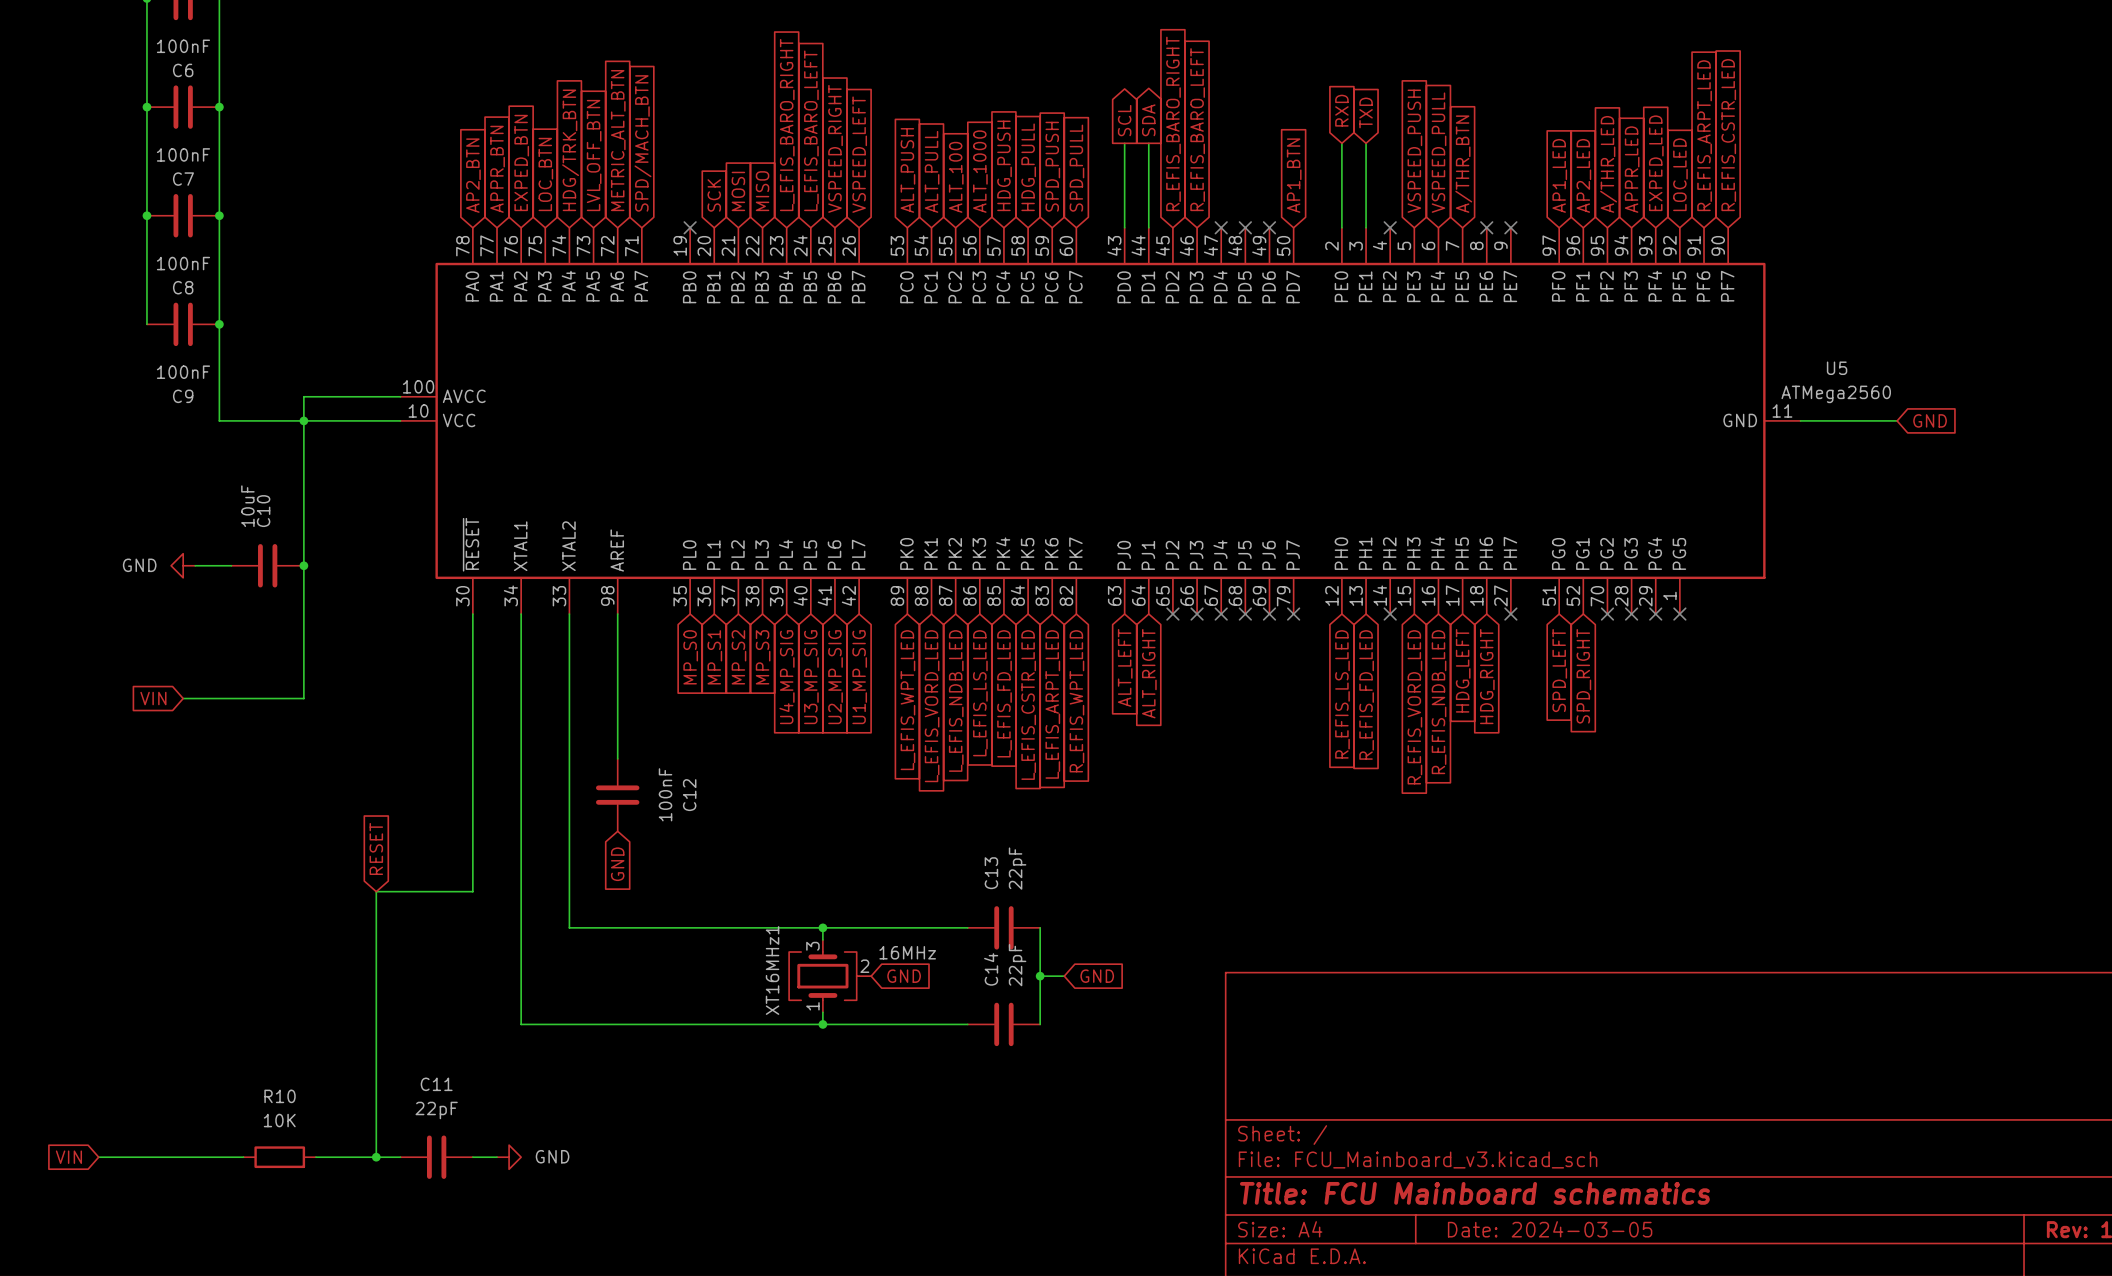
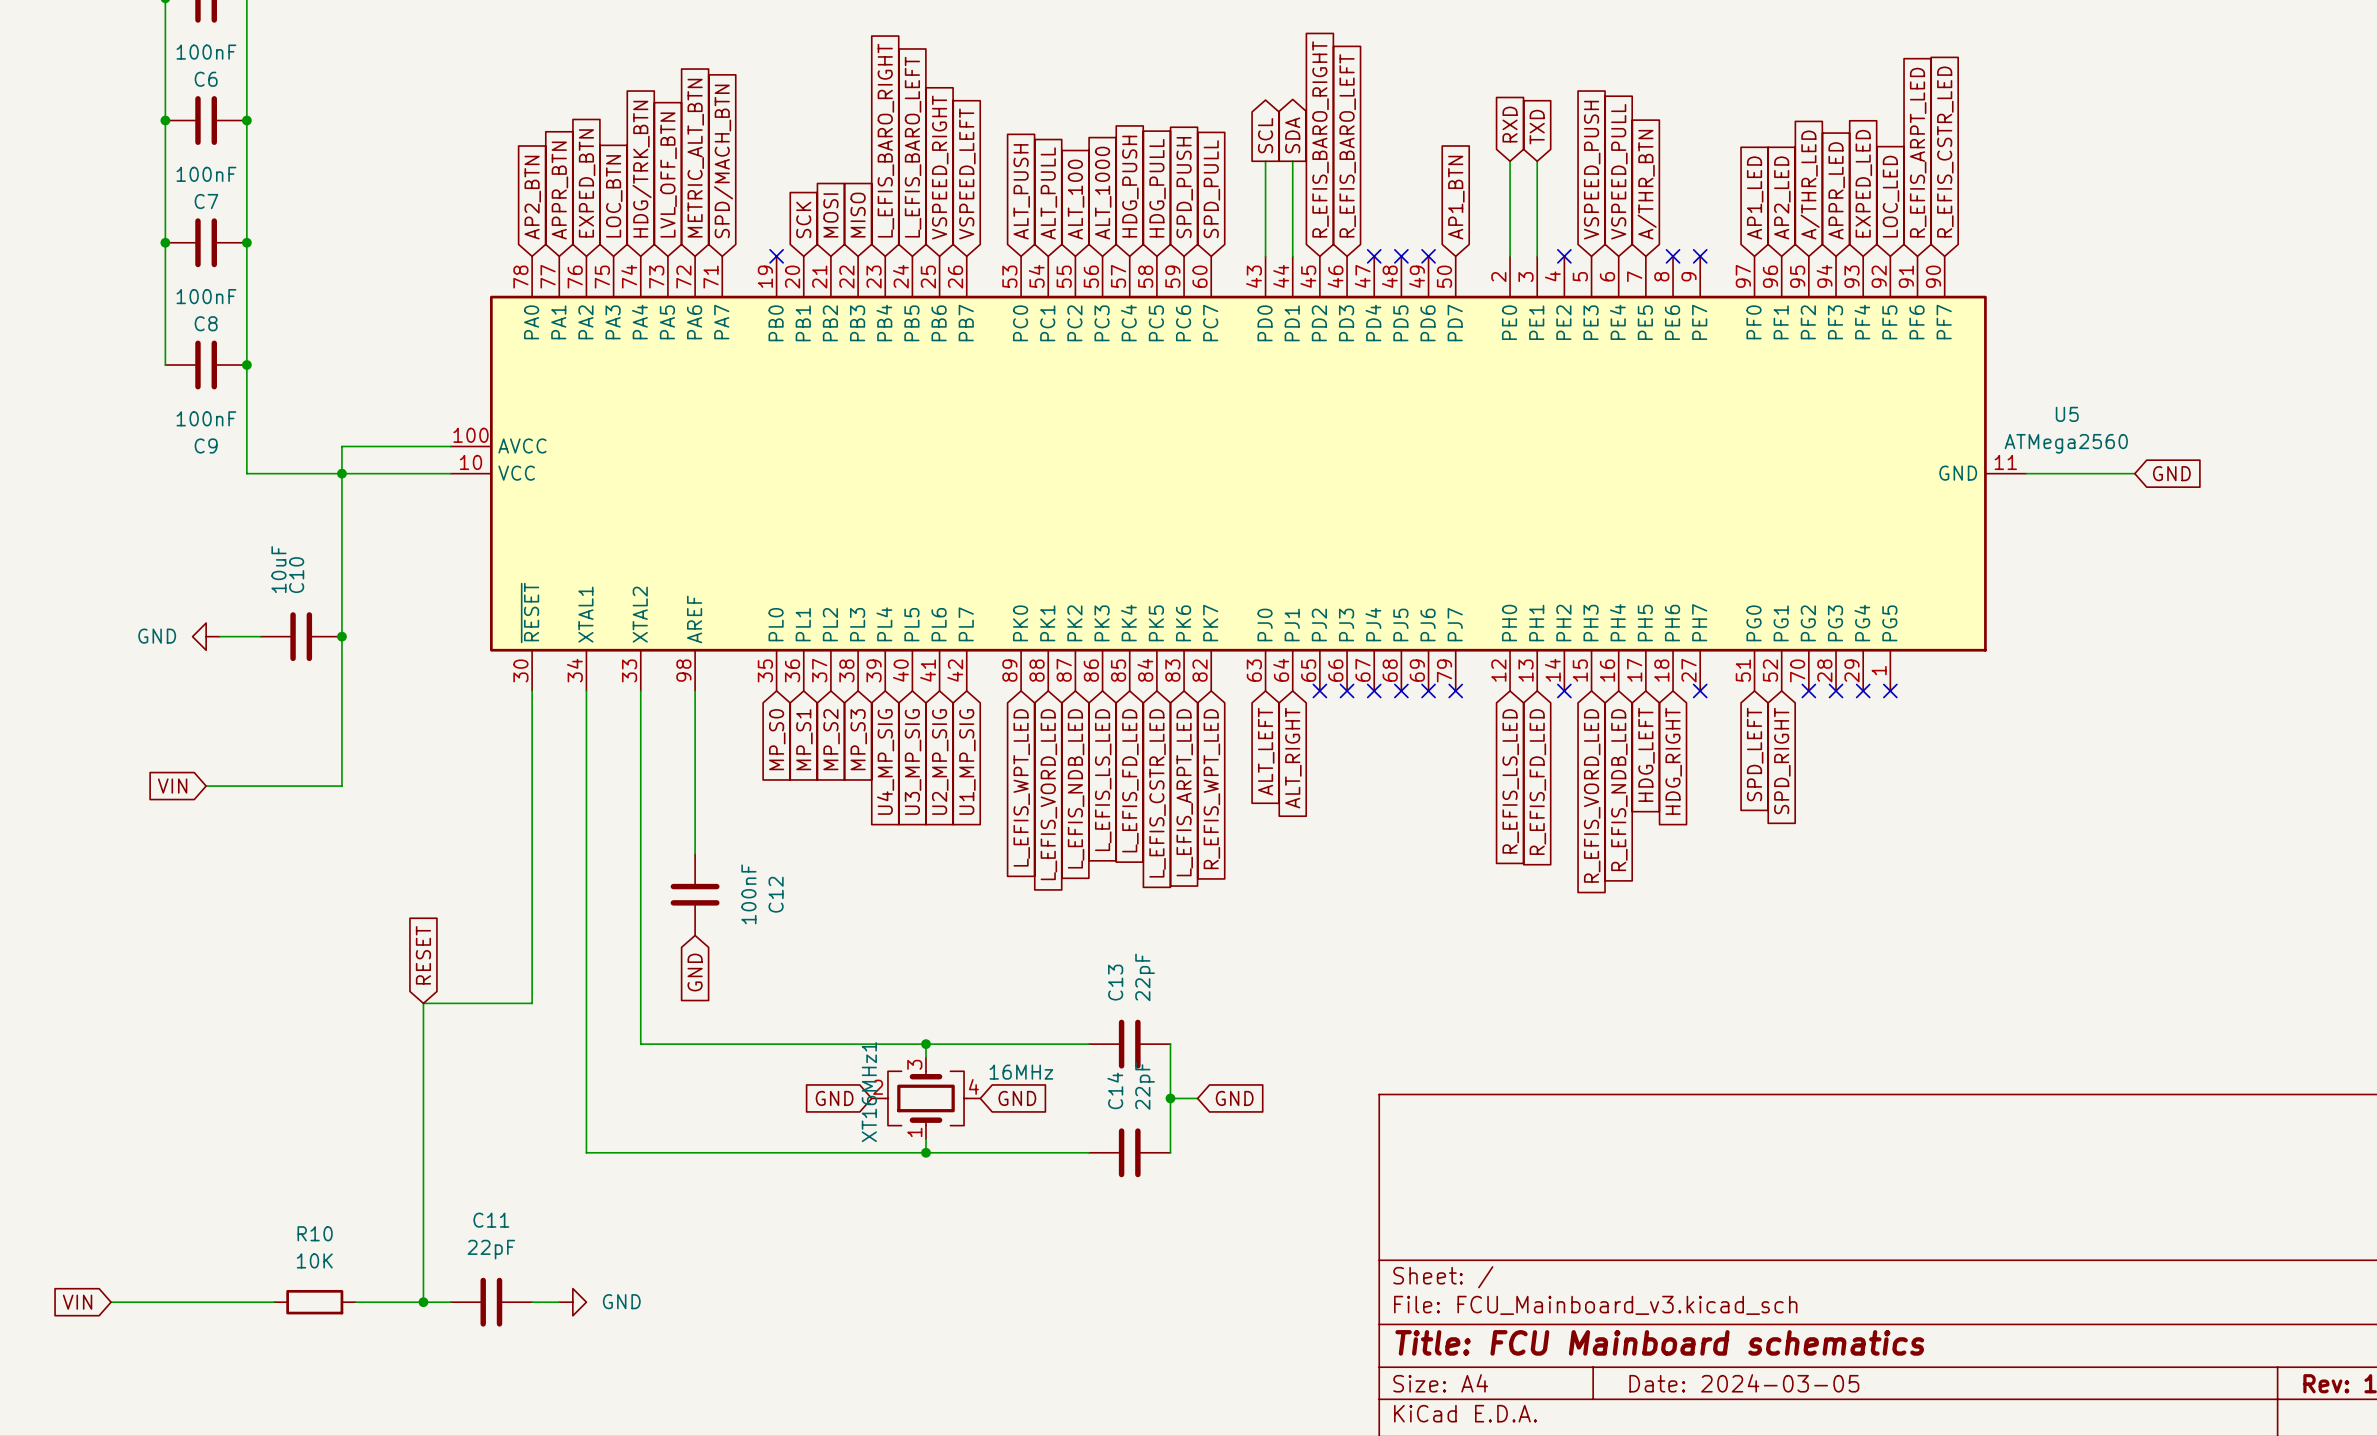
XT16MHz1 symbol: [789, 939, 872, 1013] -> [871, 1057, 981, 1140]
global label: none -> GND (834, 1098)

